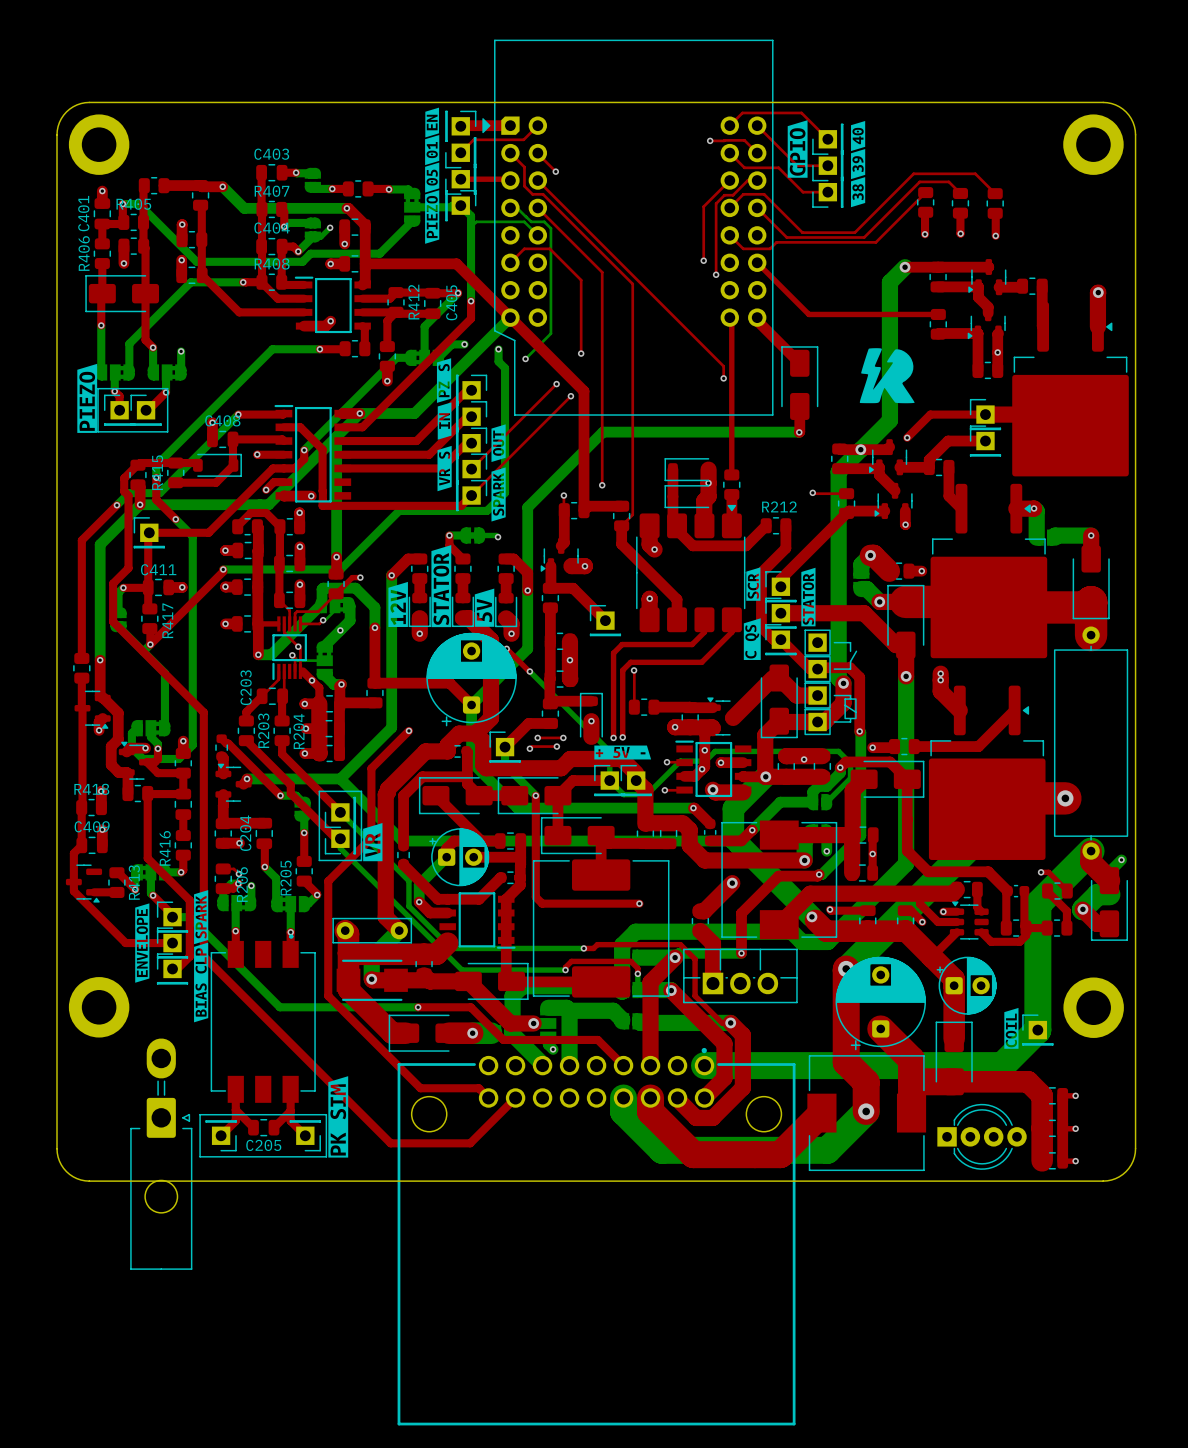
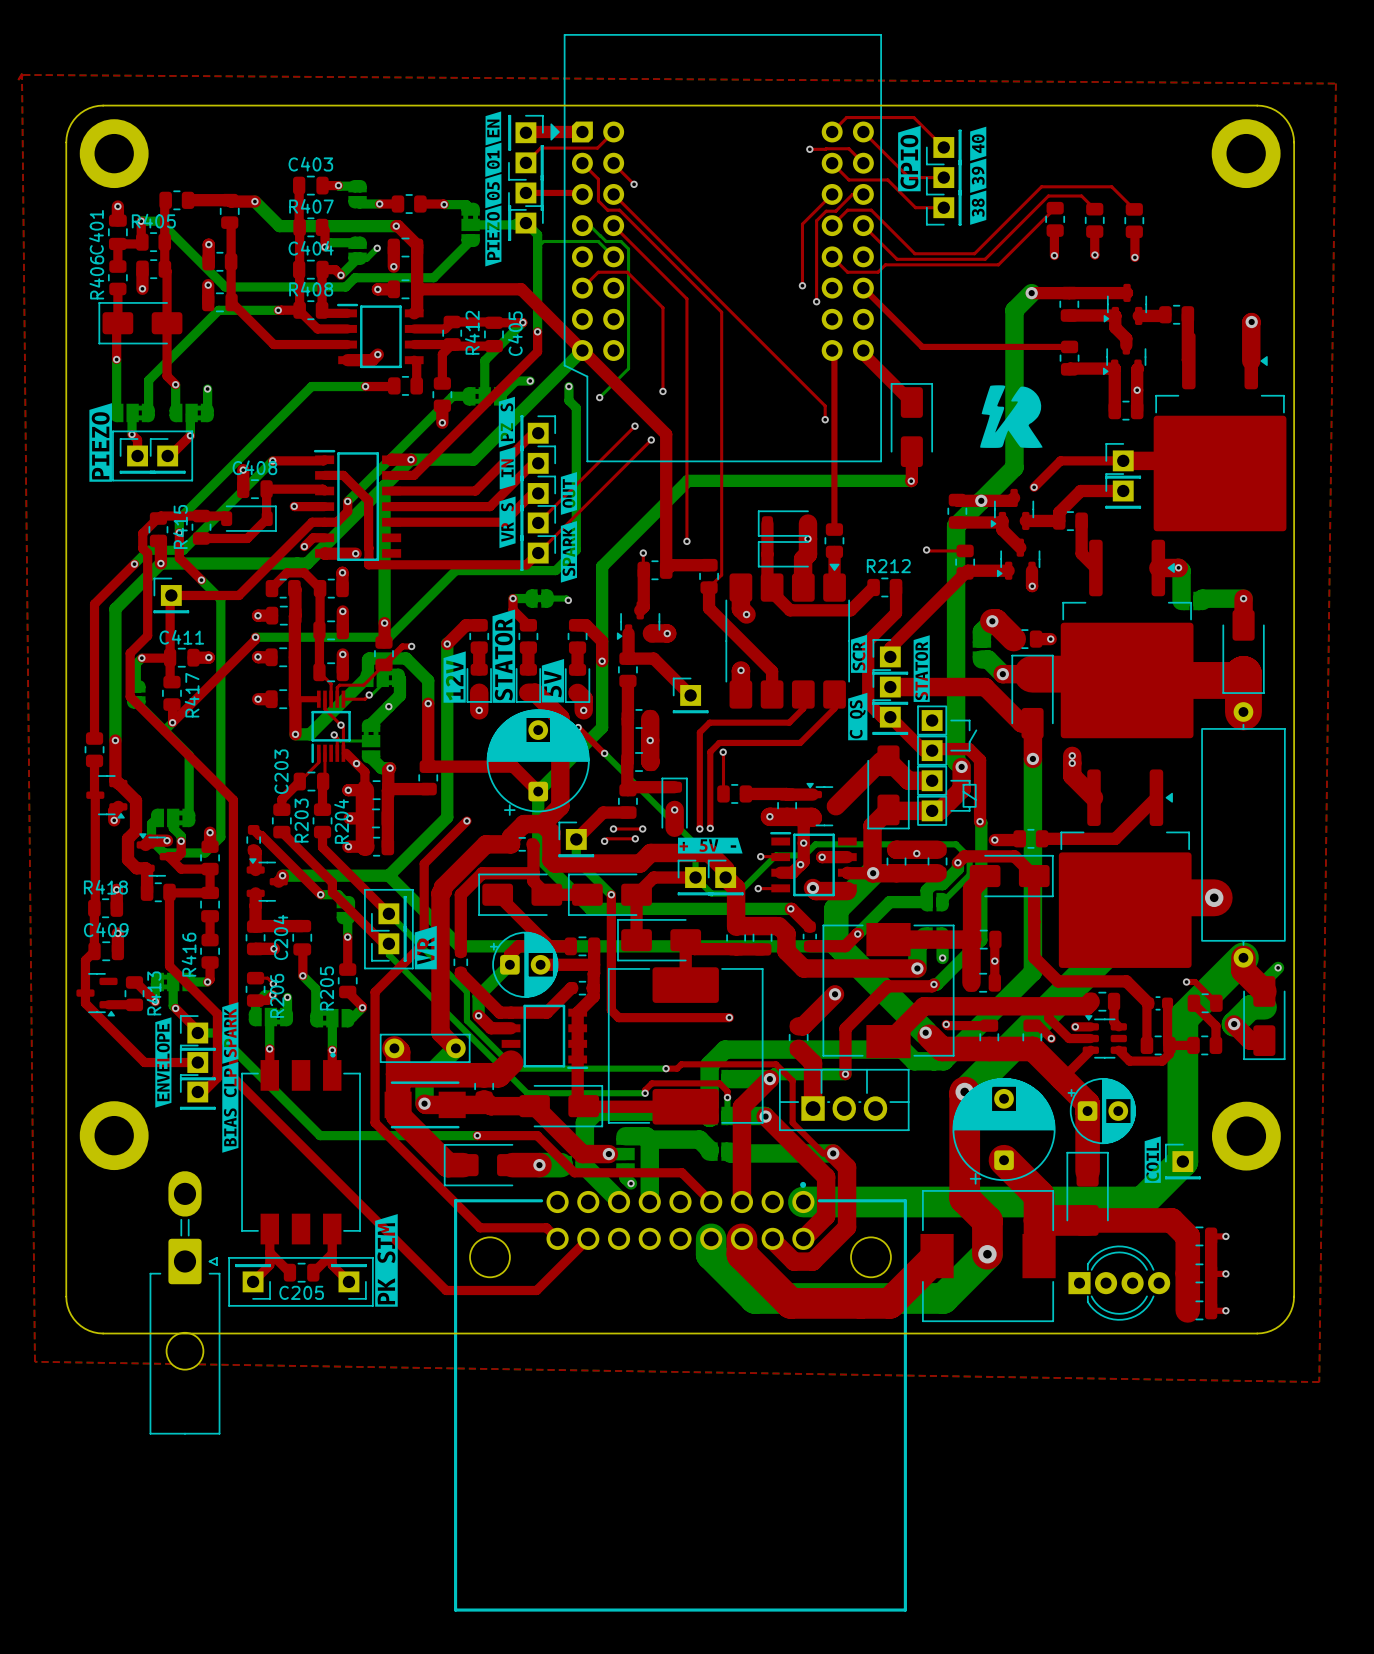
top zone outline: none -> (22, 73) (34, 1361) (1319, 1382) (1335, 83) (23, 74) (18, 79) (22, 73)

